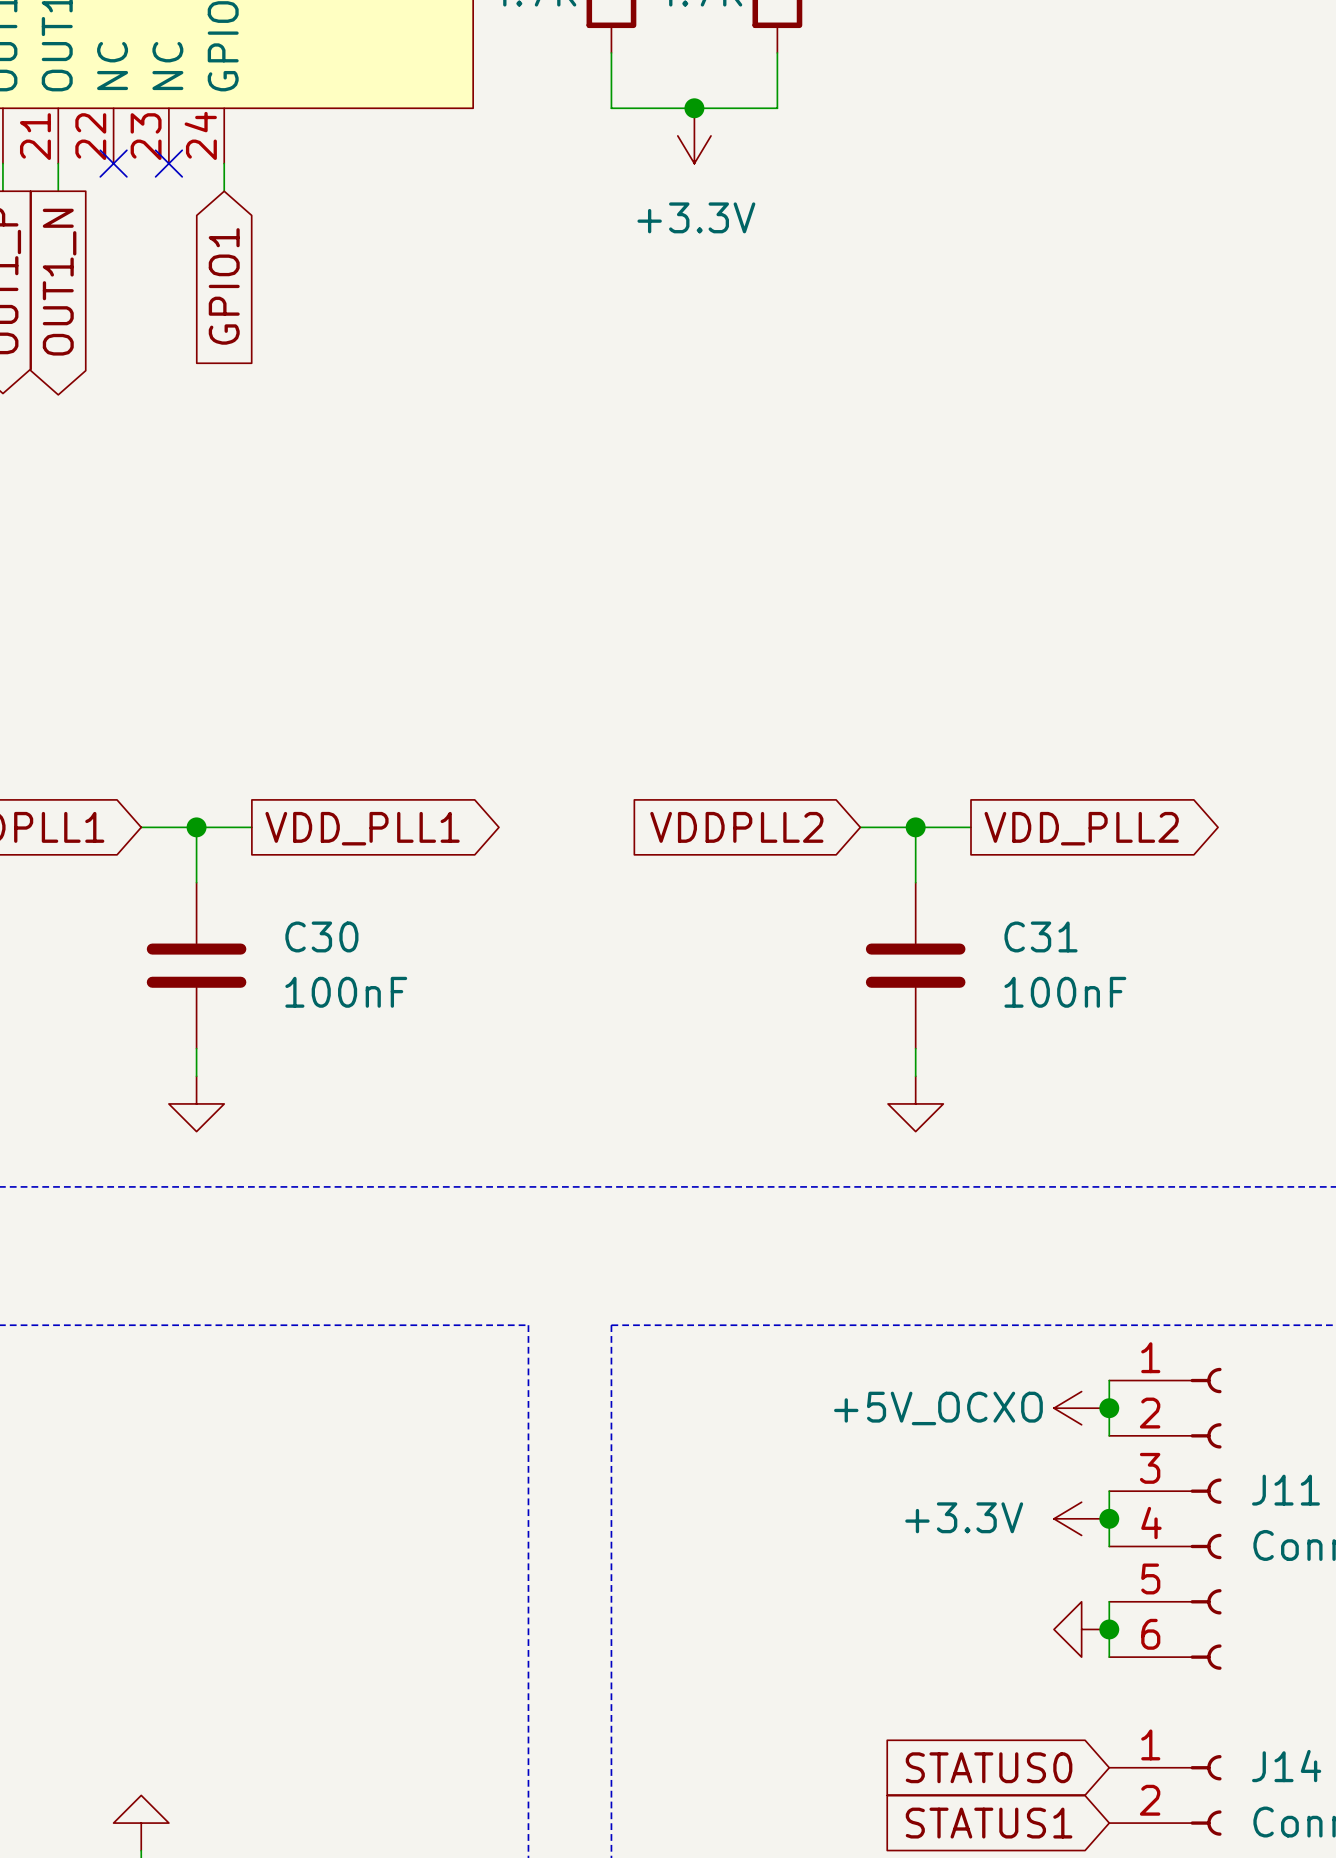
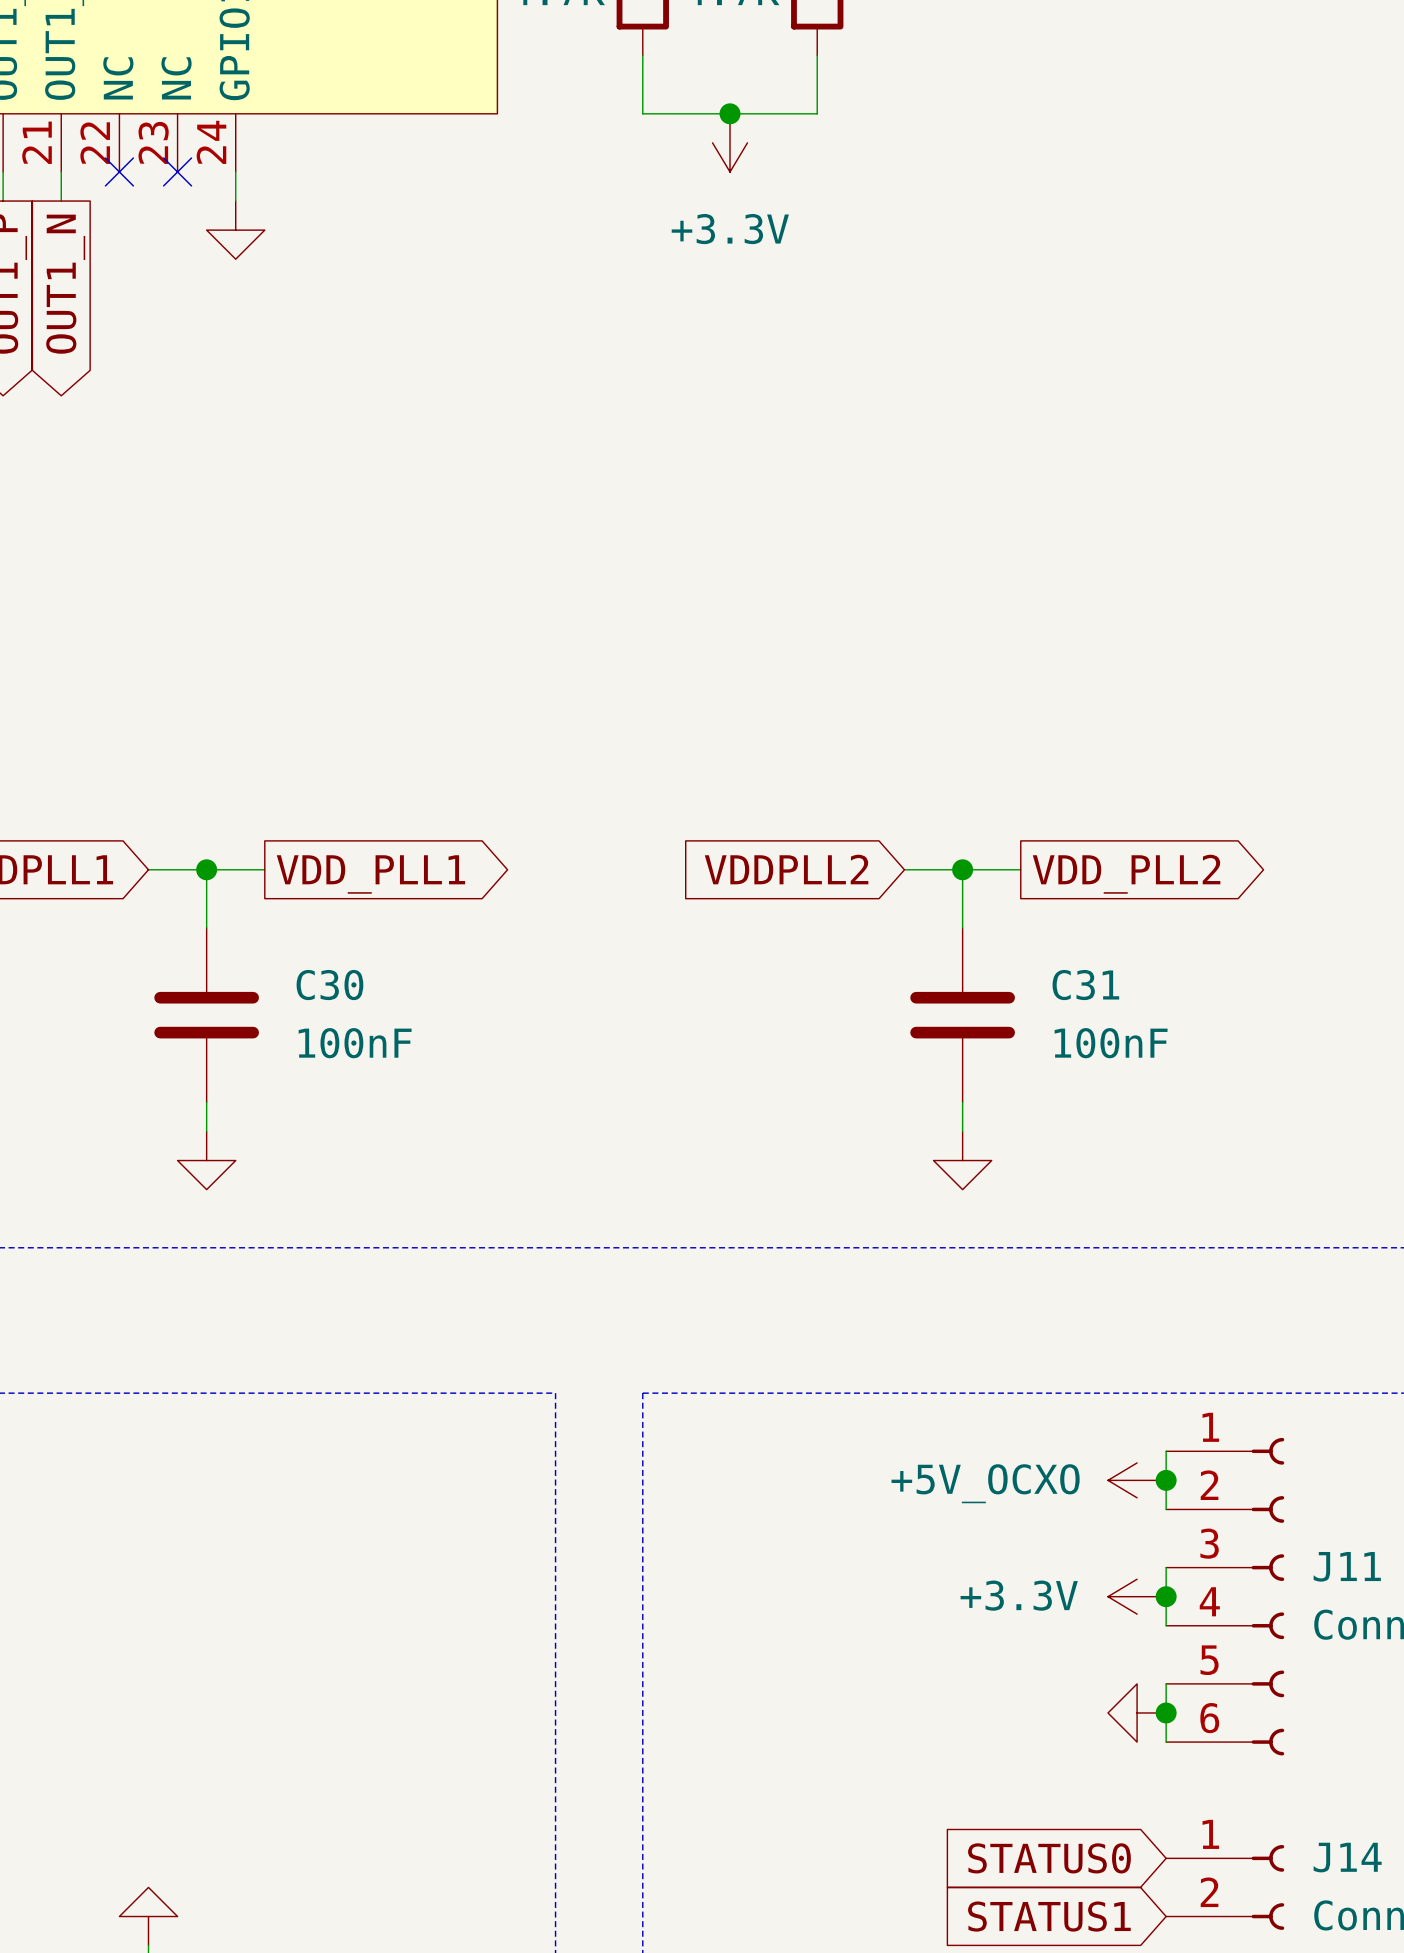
power symbol: none -> (235, 230)
global label: GPIO1 (224, 286) -> none

